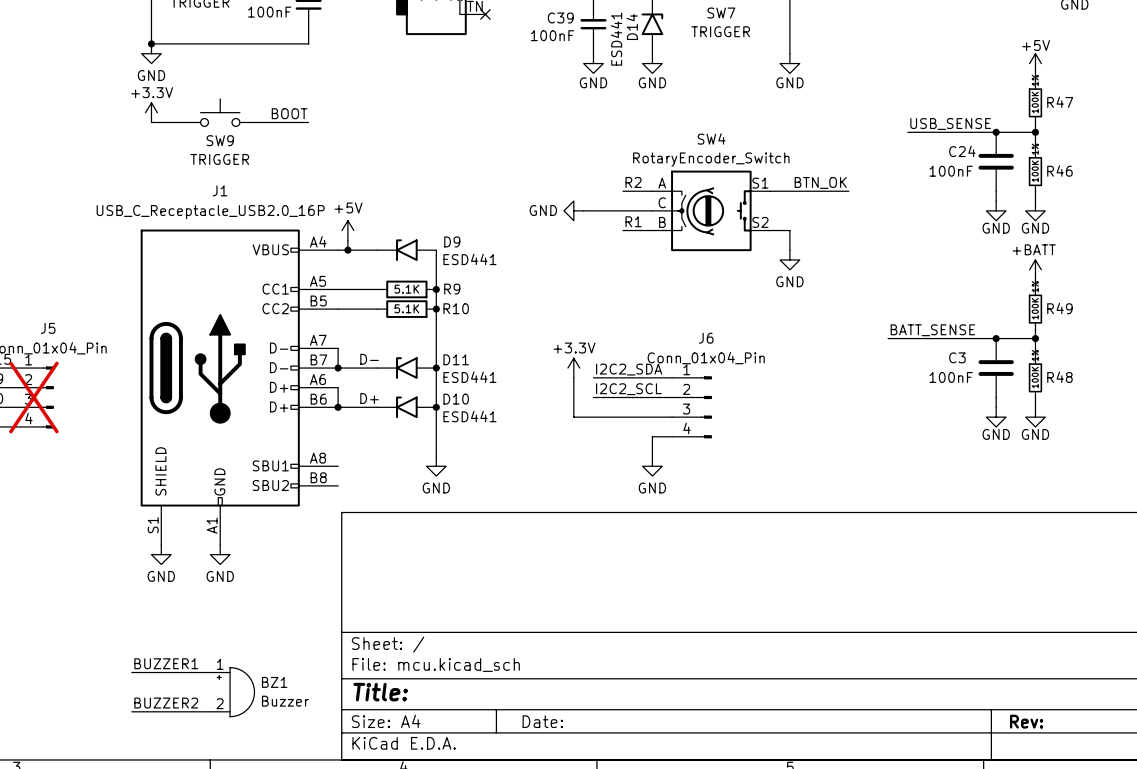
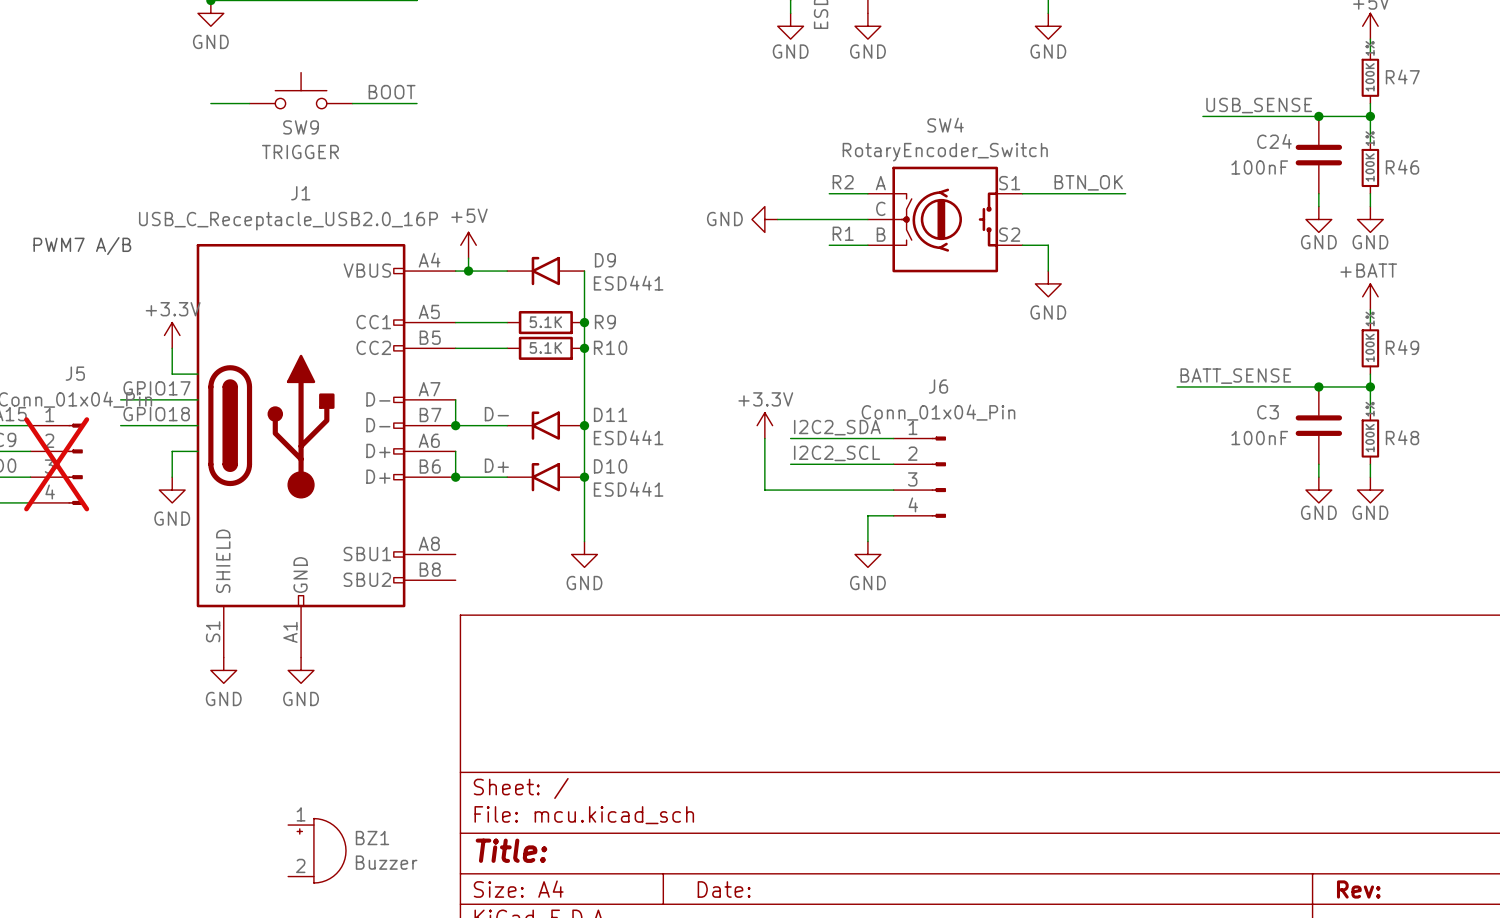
power symbol position: +3.3V (151, 112) -> +3.3V (172, 335)
text: none -> PWM7 A/B (82, 246)
wire: none -> (172, 348) (172, 374) (197, 374)
label: none -> GPIO17 (156, 388)
wire: none -> (120, 399) (197, 399)
label: none -> GPIO18 (156, 414)
wire: none -> (120, 425) (197, 425)
wire: none -> (197, 451) (172, 451) (172, 477)
power symbol: none -> GND (172, 490)
label: BUZZER1 (166, 663) -> none
wire: (131, 672) (210, 672) -> none
label: BUZZER2 (166, 703) -> none
wire: (131, 711) (210, 711) -> none

